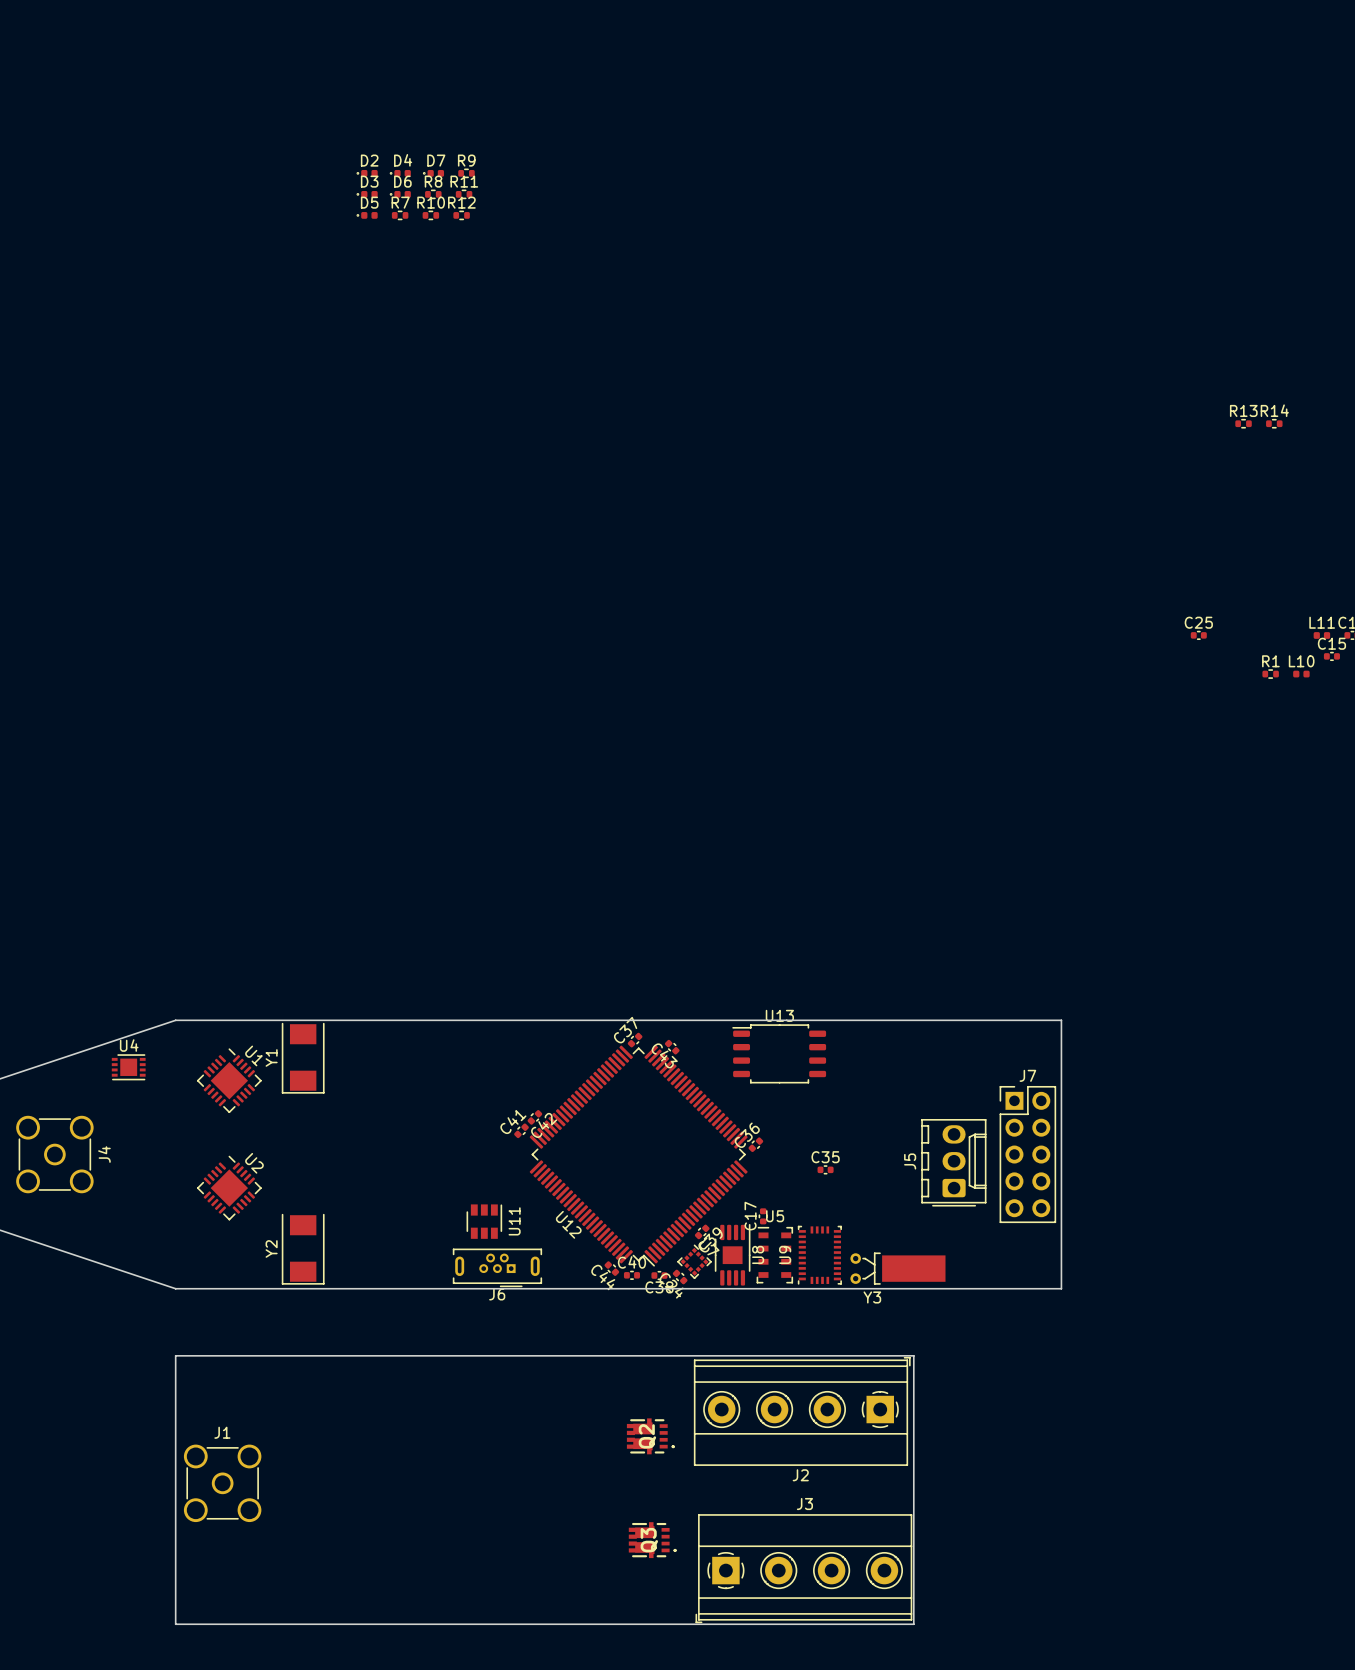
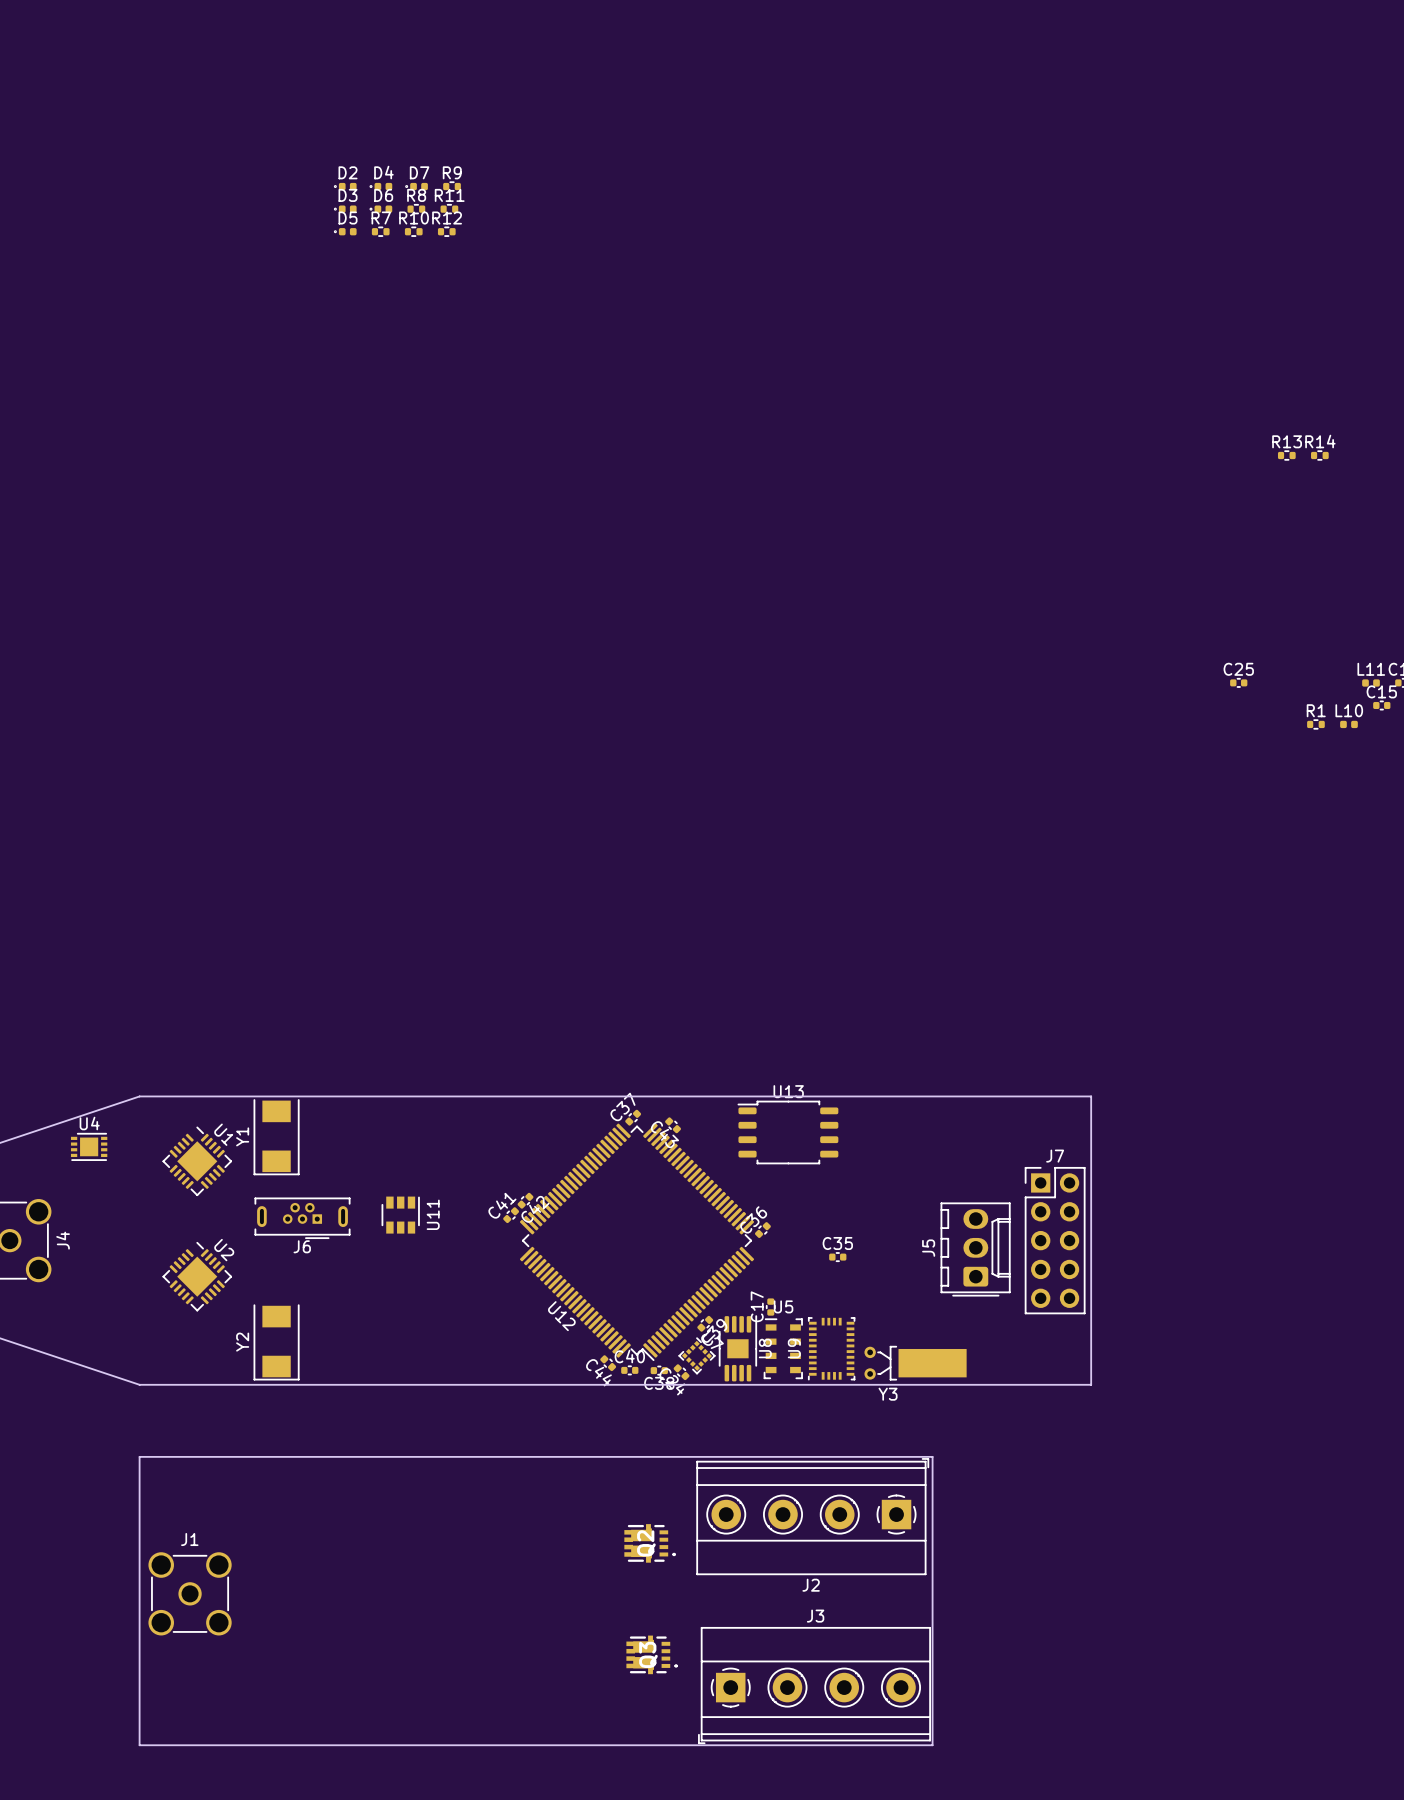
U11 position: (484, 1221) -> (400, 1215)
J6 position: (497, 1267) -> (302, 1218)

